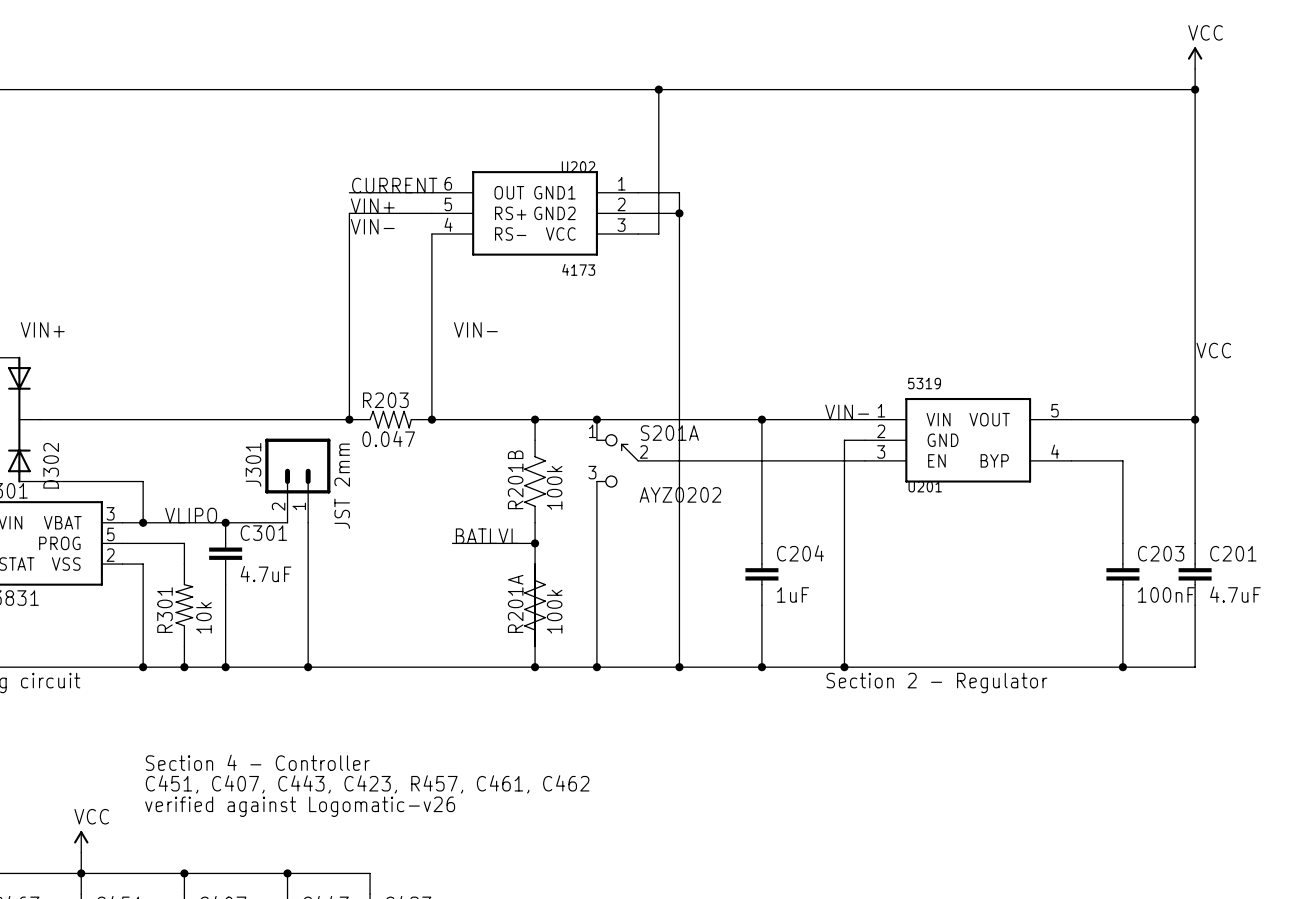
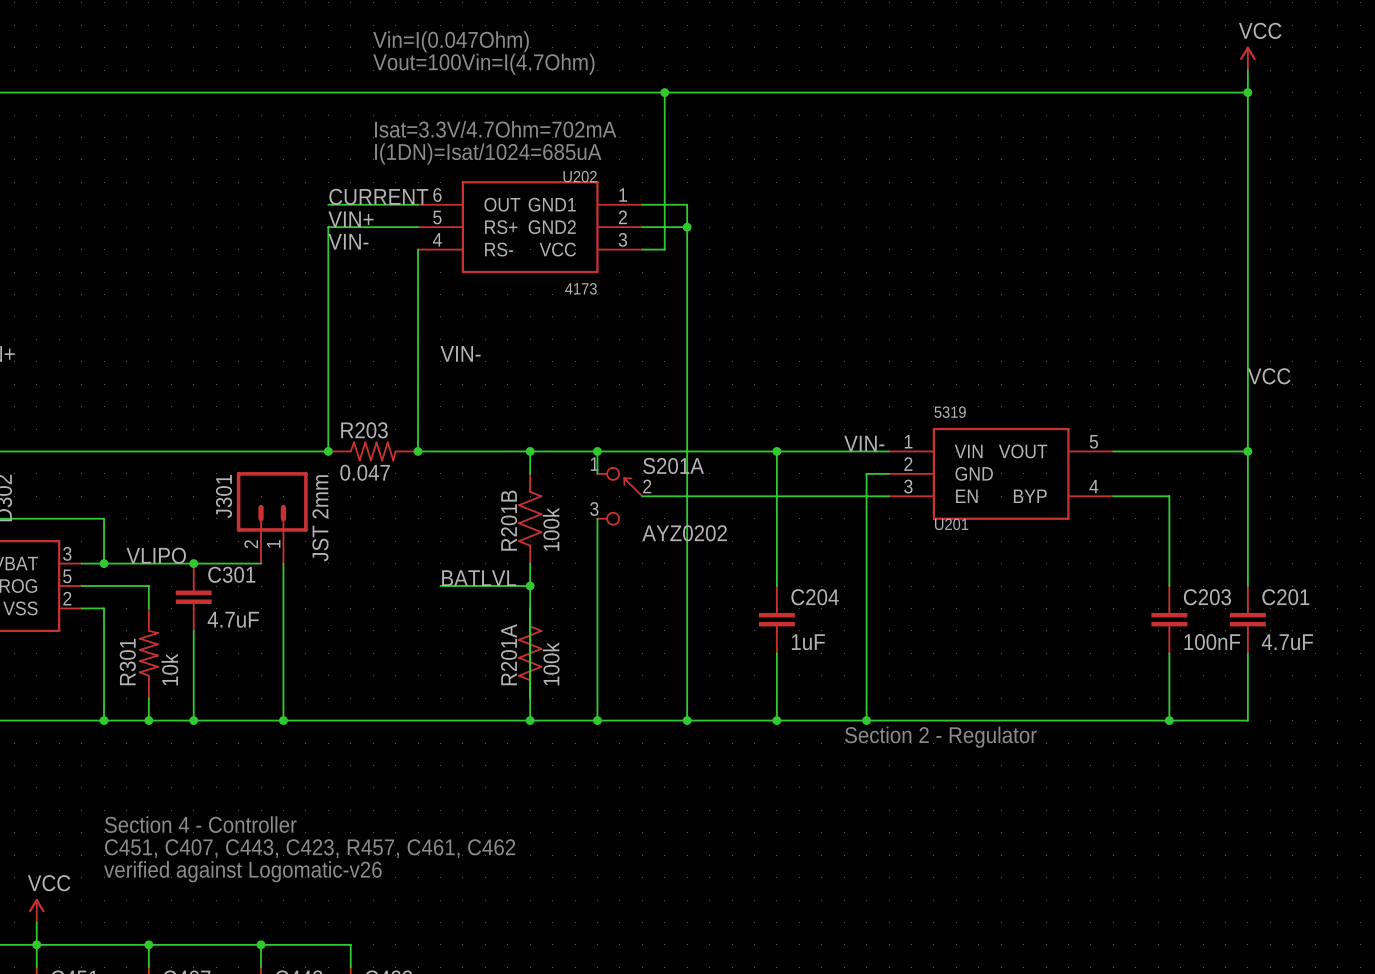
text: none -> Vin=I(0.047Ohm) (451, 41)
text: none -> Vout=100Vin=I(4.7Ohm) (483, 64)
text: none -> Isat=3.3V/4.7Ohm=702mA (495, 129)
text: none -> I(1DN)=Isat/1024=685uA (488, 153)

